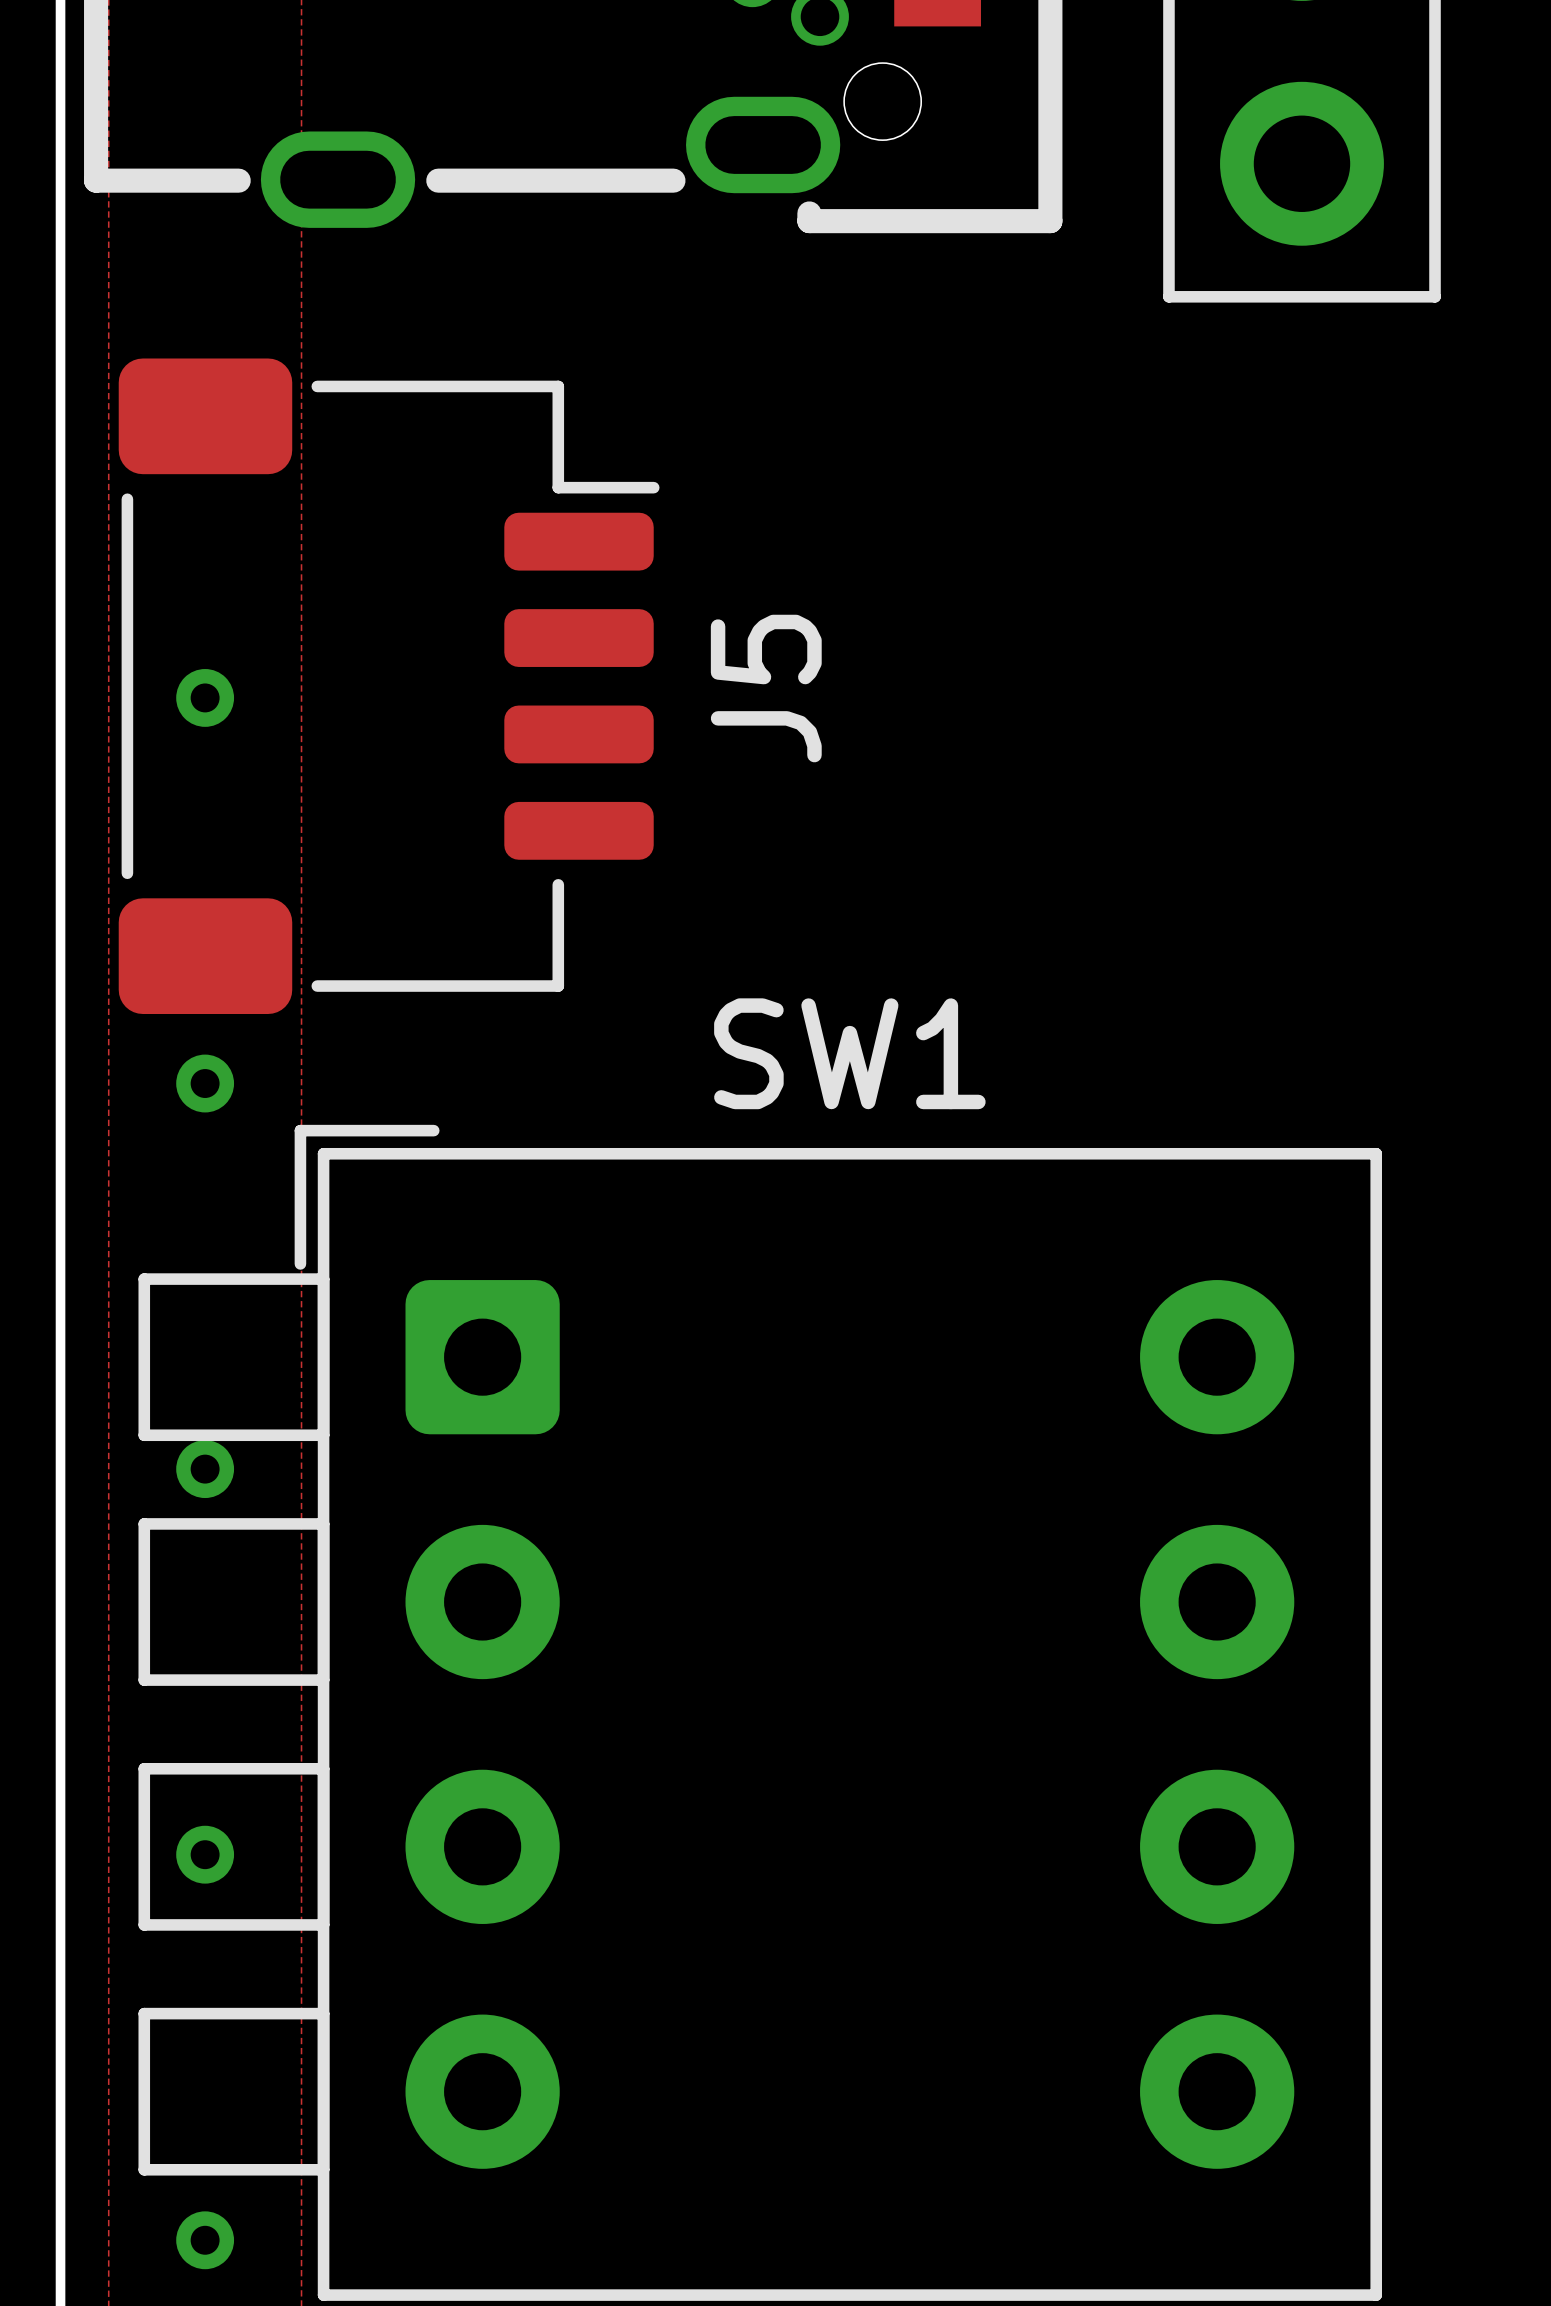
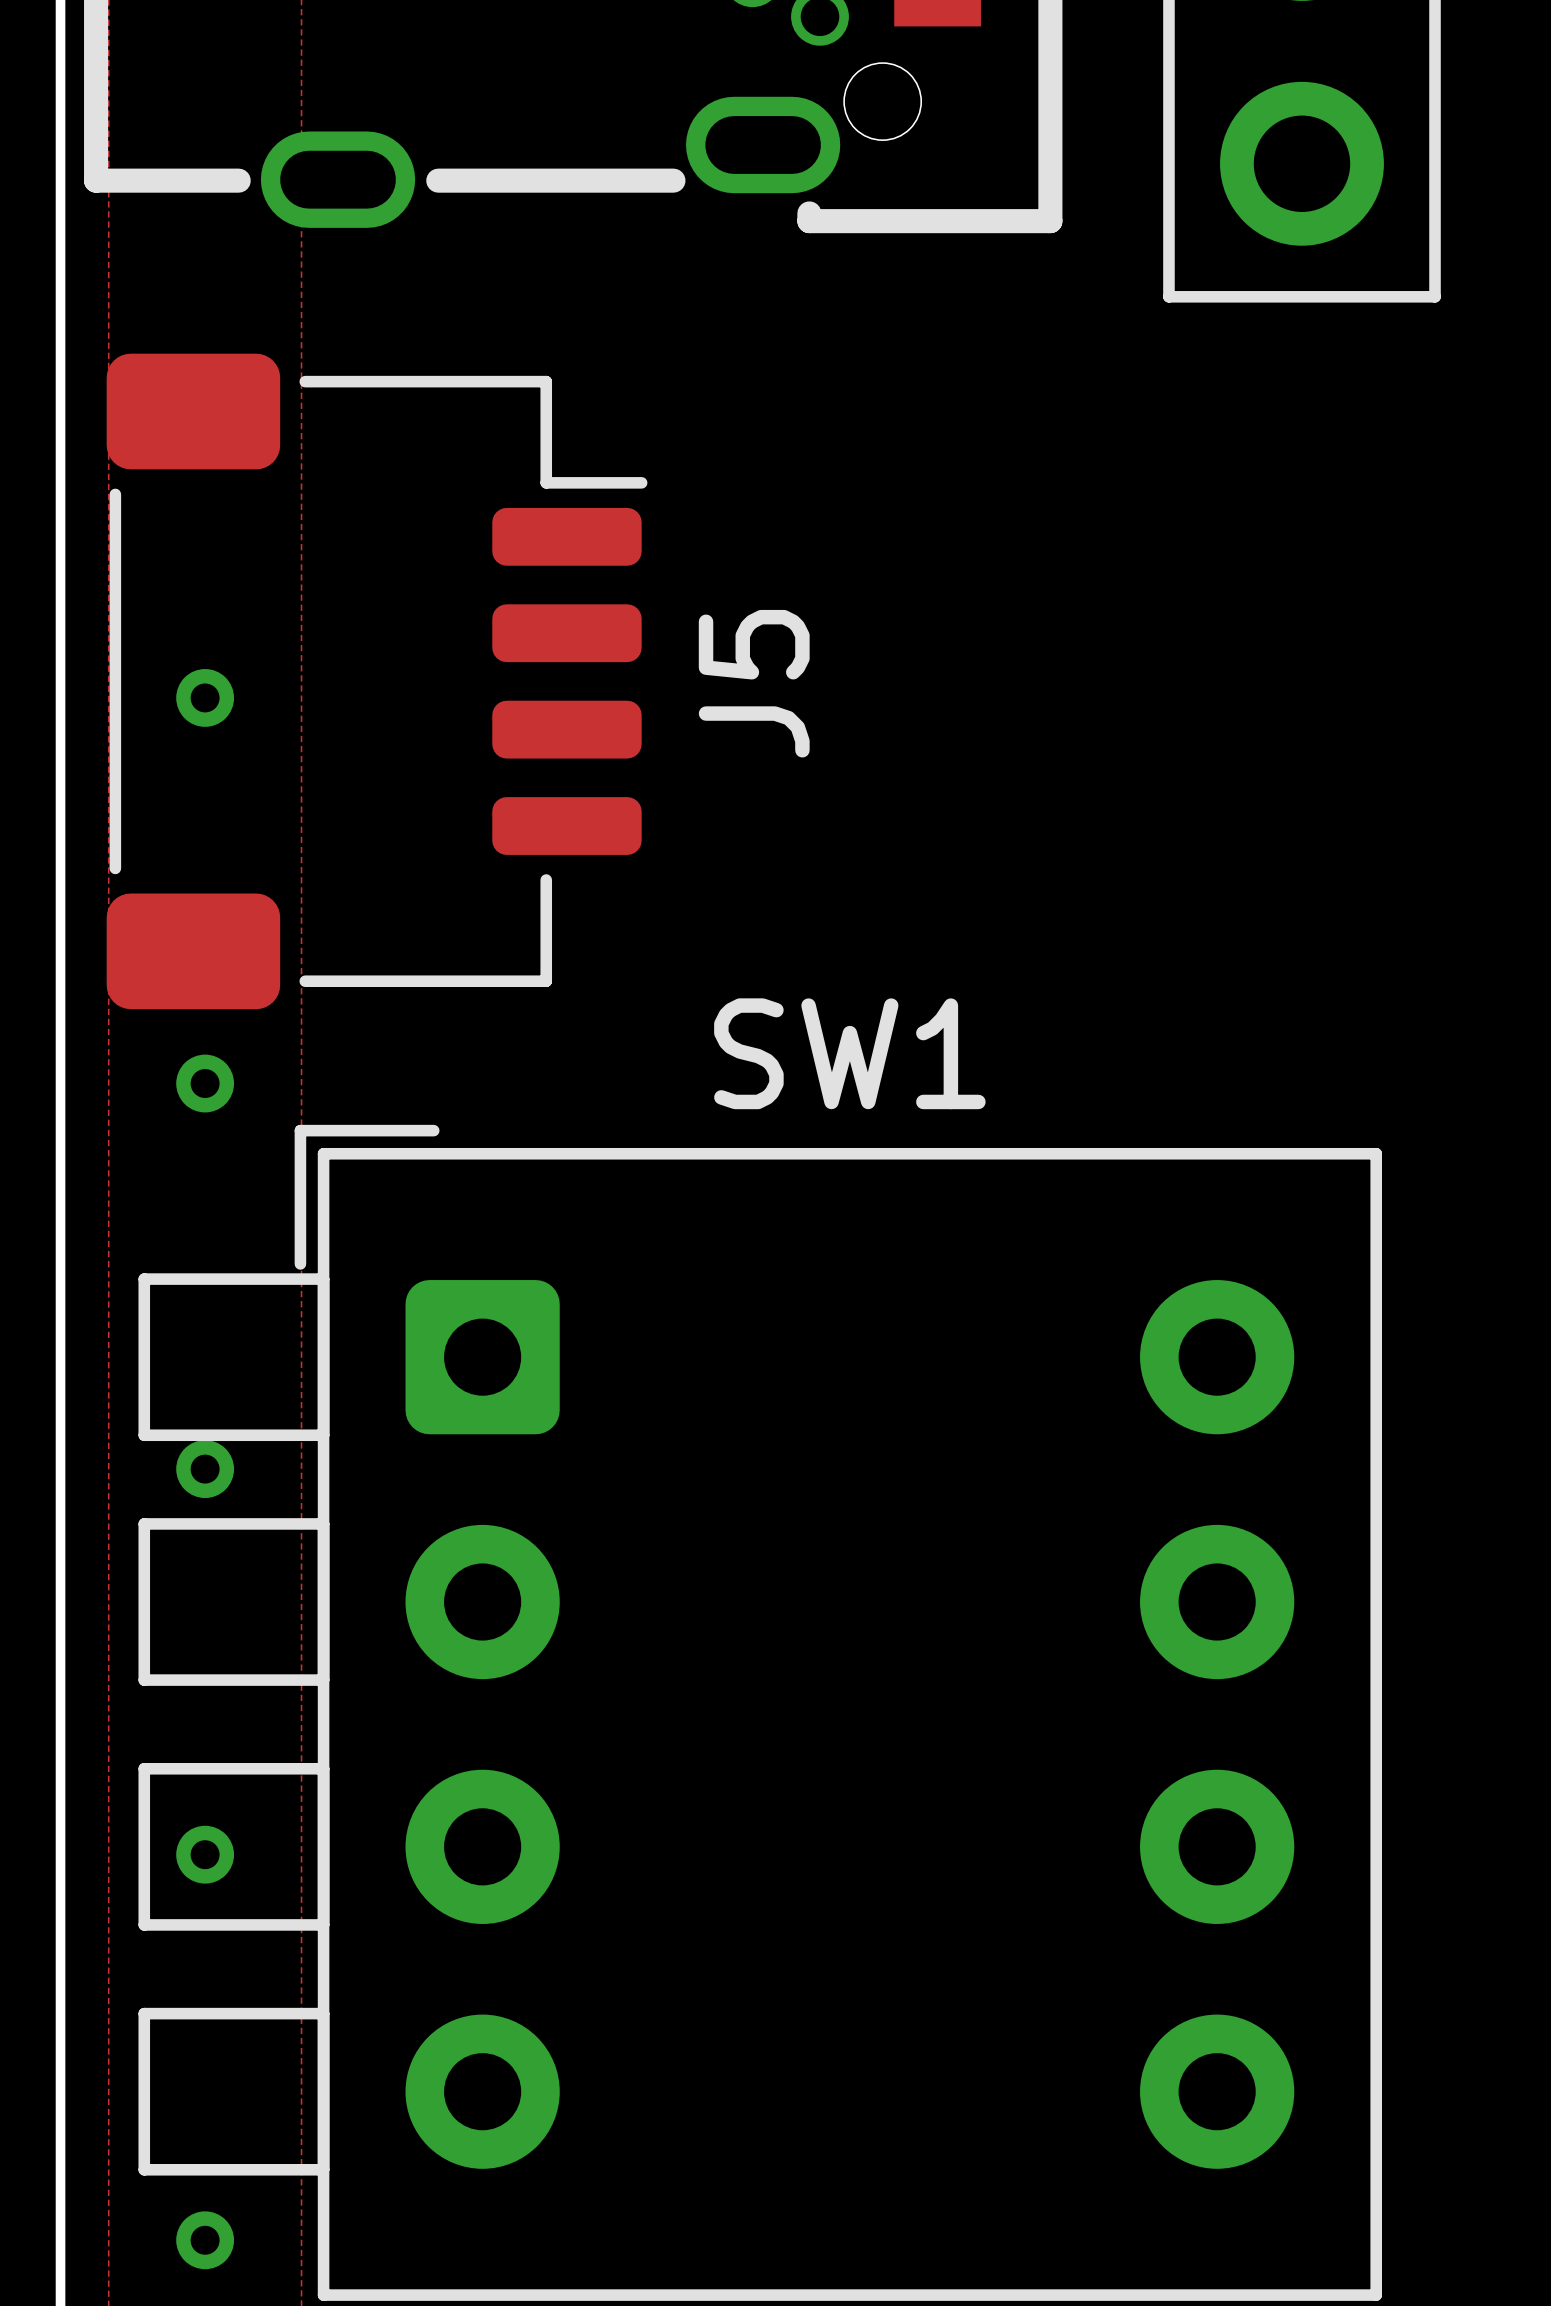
J5 position: (389, 686) -> (377, 681)

